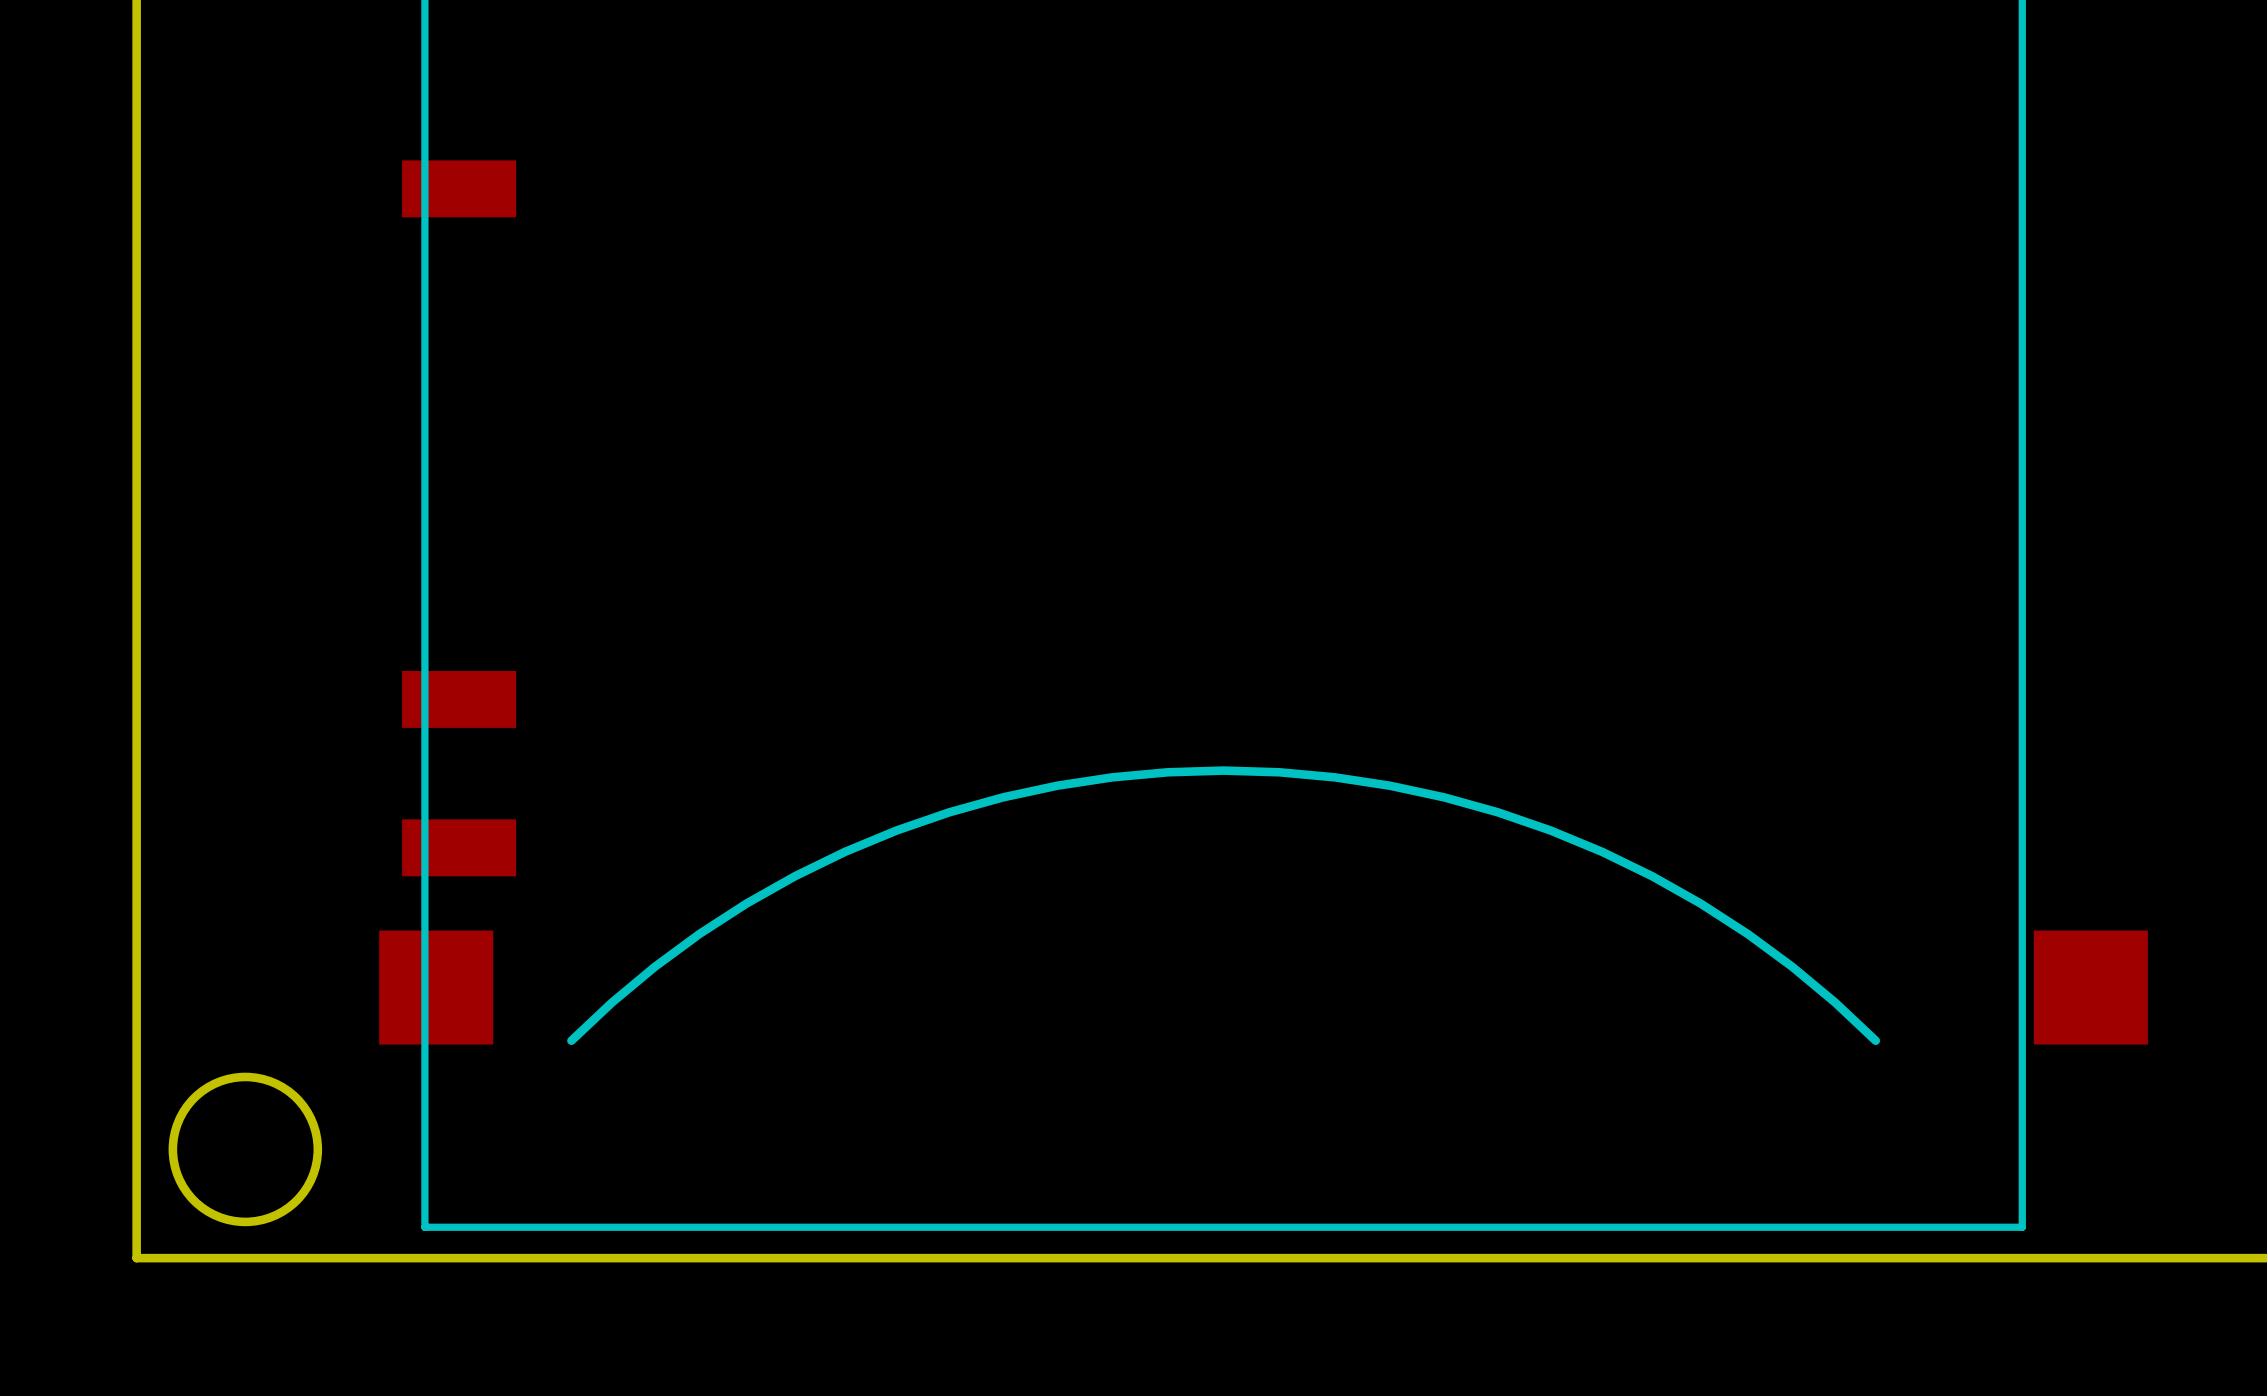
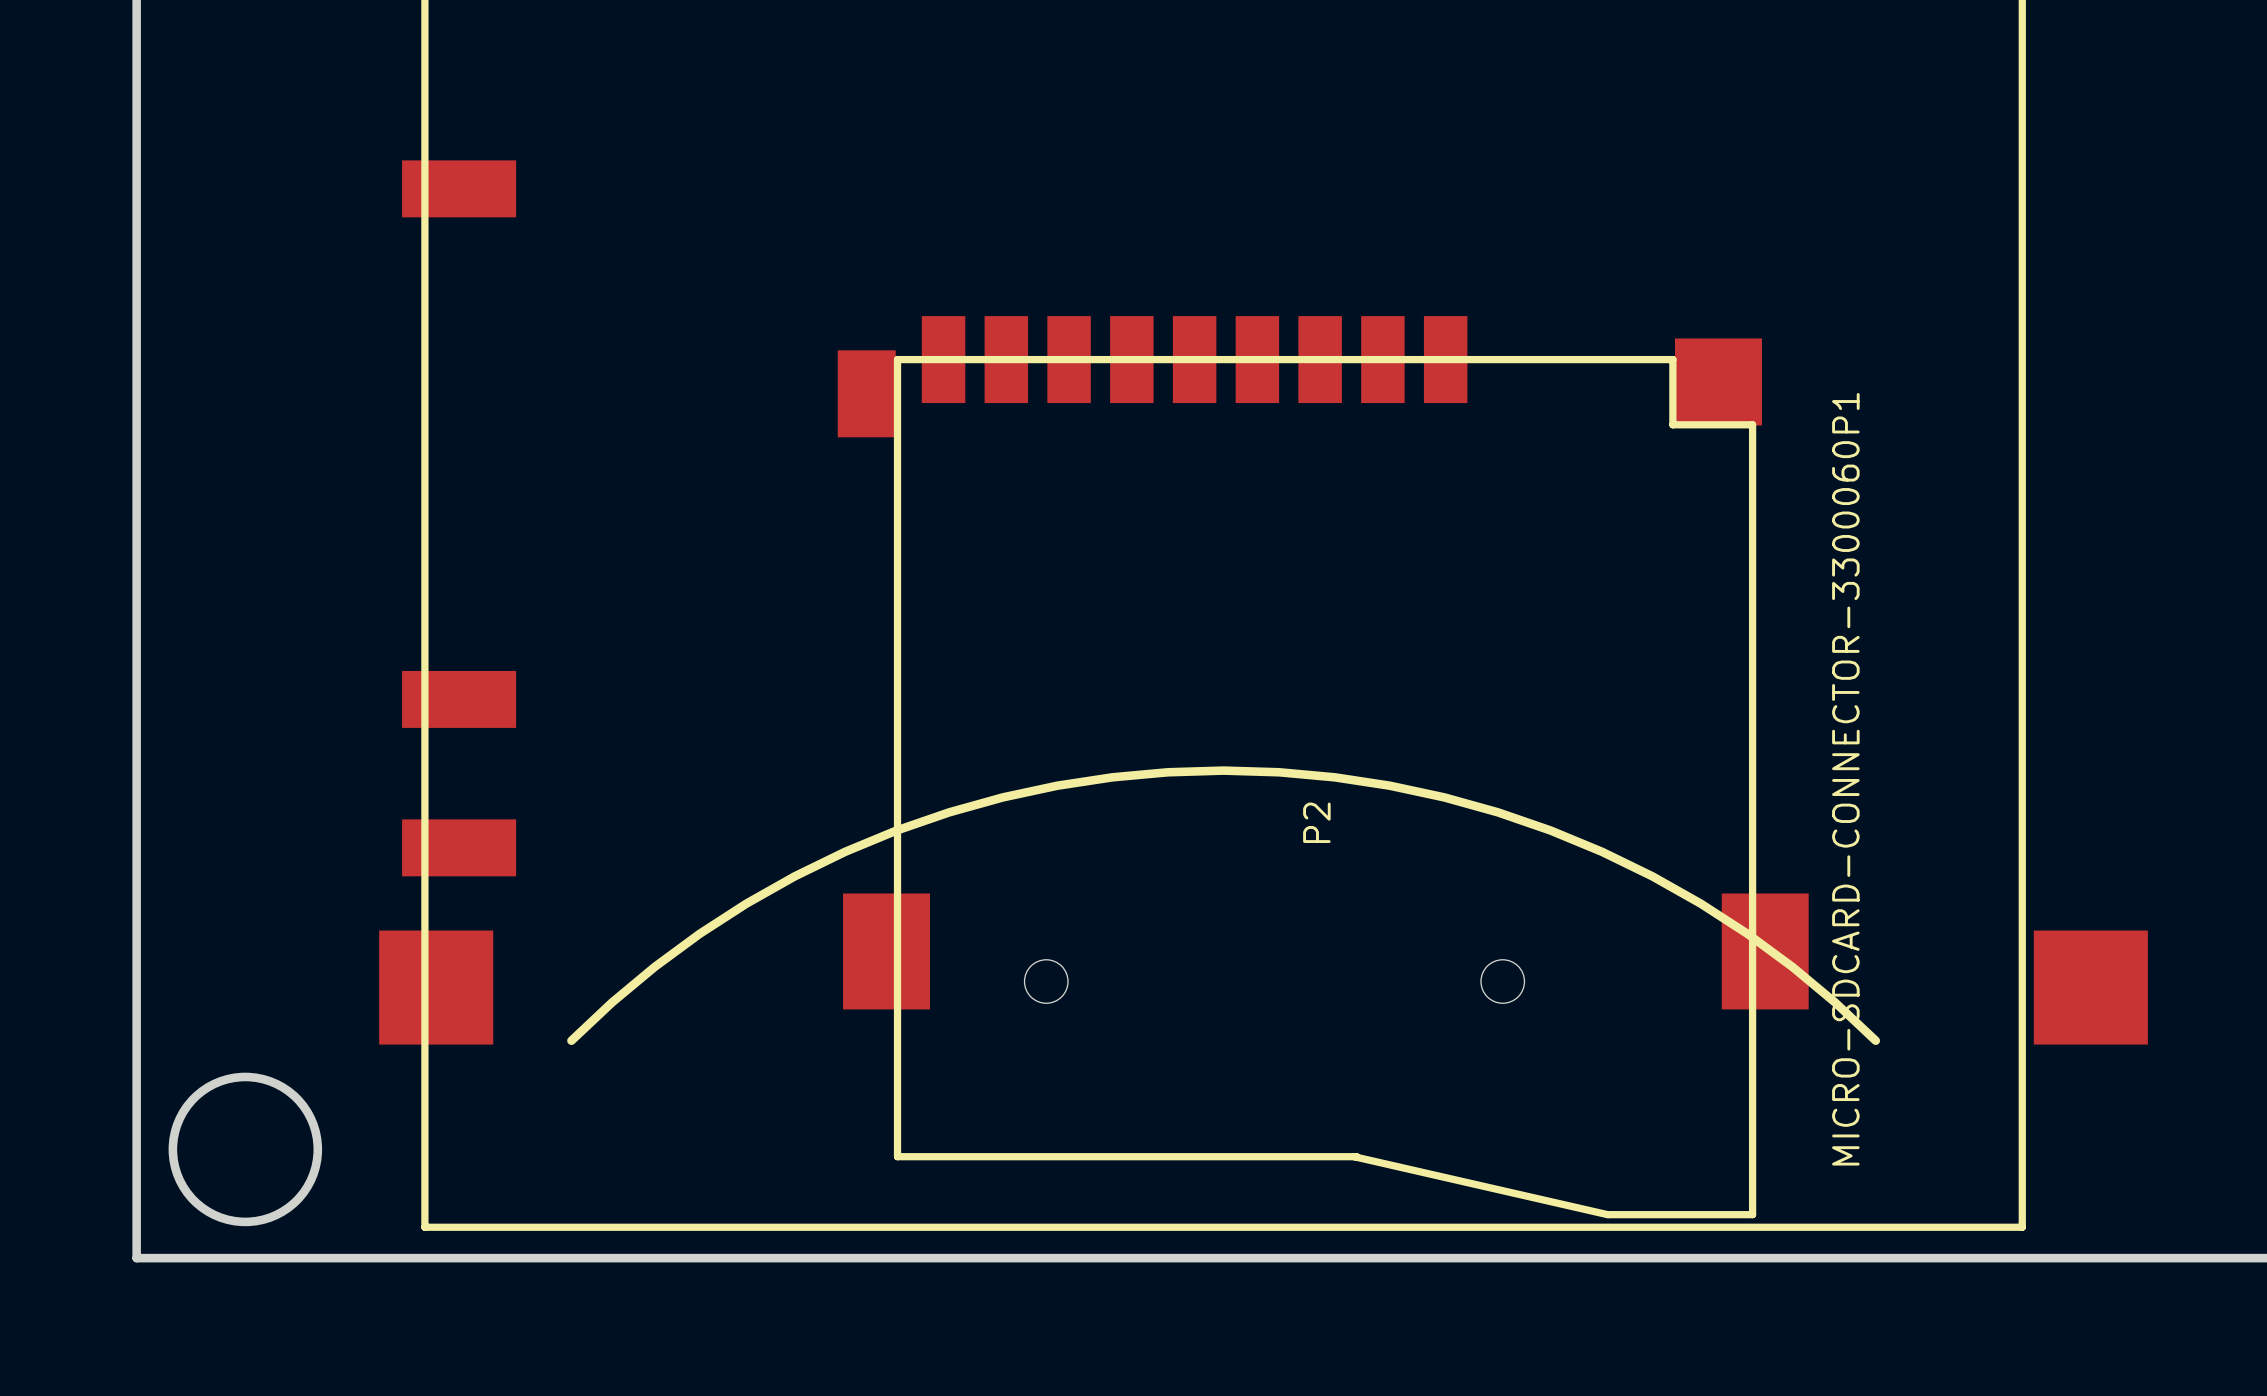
P2: none -> MICRO-SDCARD-CONNECTOR-3300060P1 (1323, 767)

